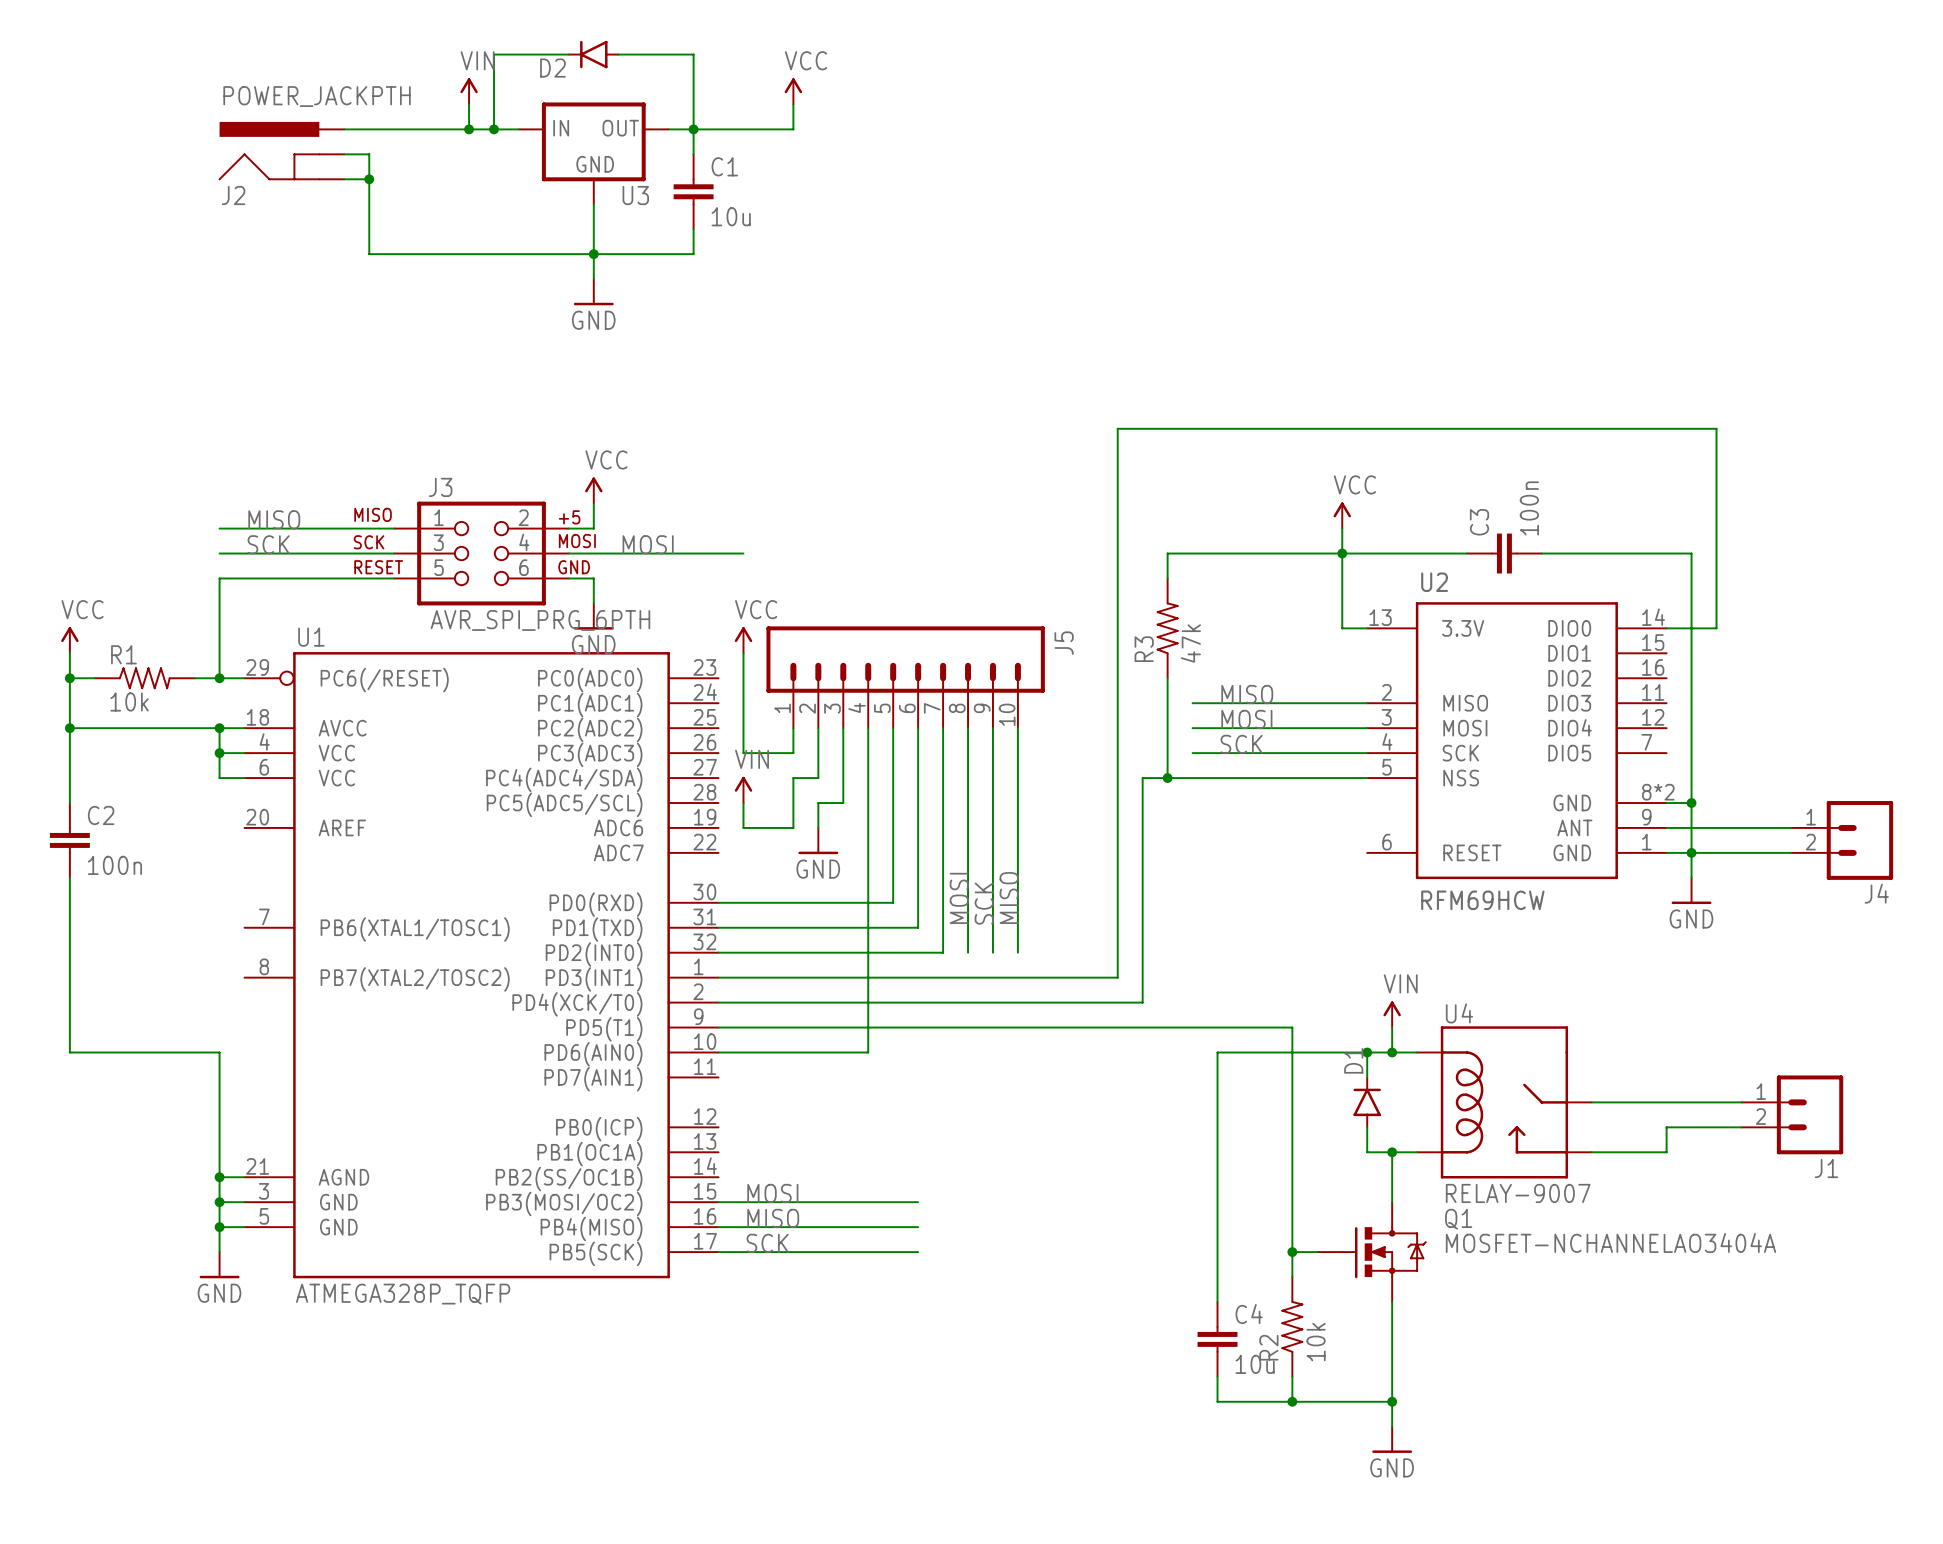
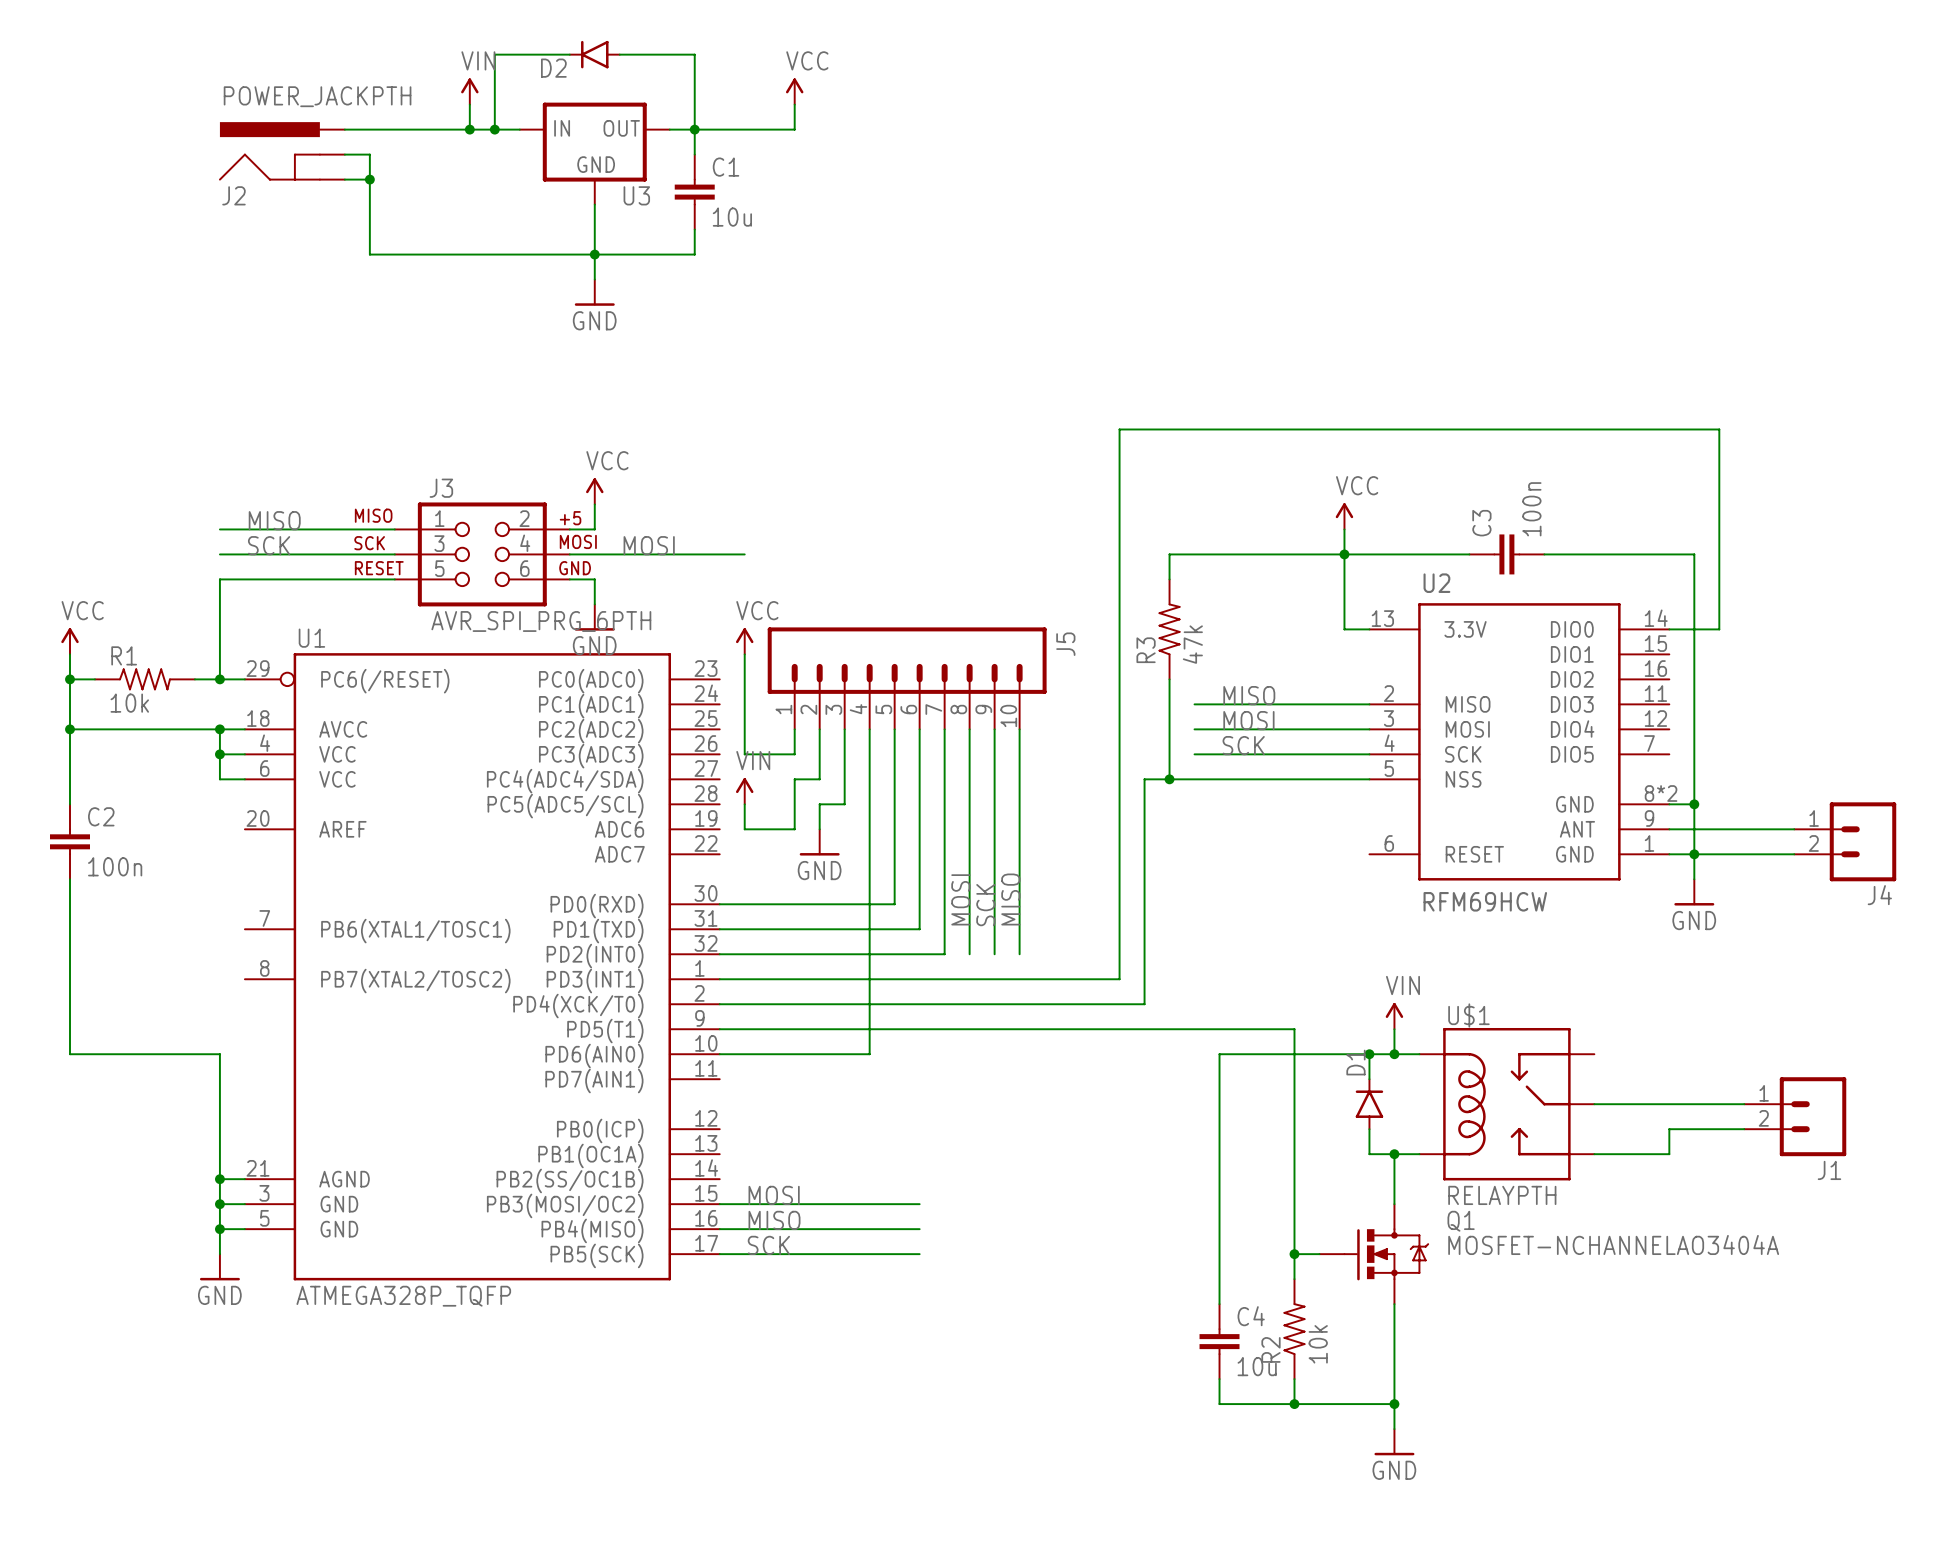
U4: RELAY-9007 (1504, 1102) -> none
U$1: none -> RELAYPTH (1506, 1104)

